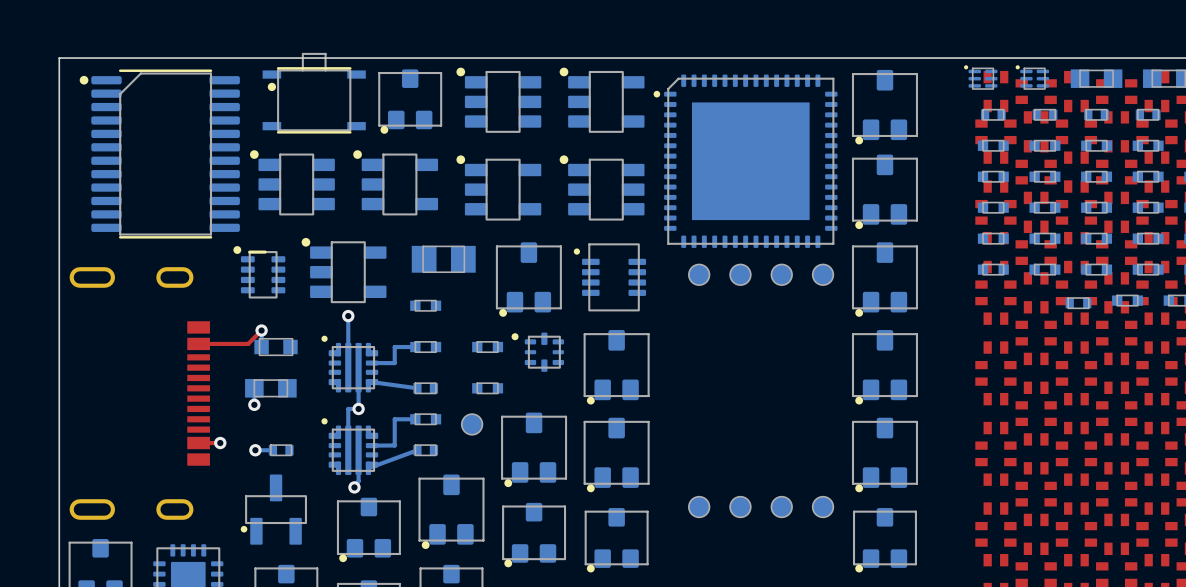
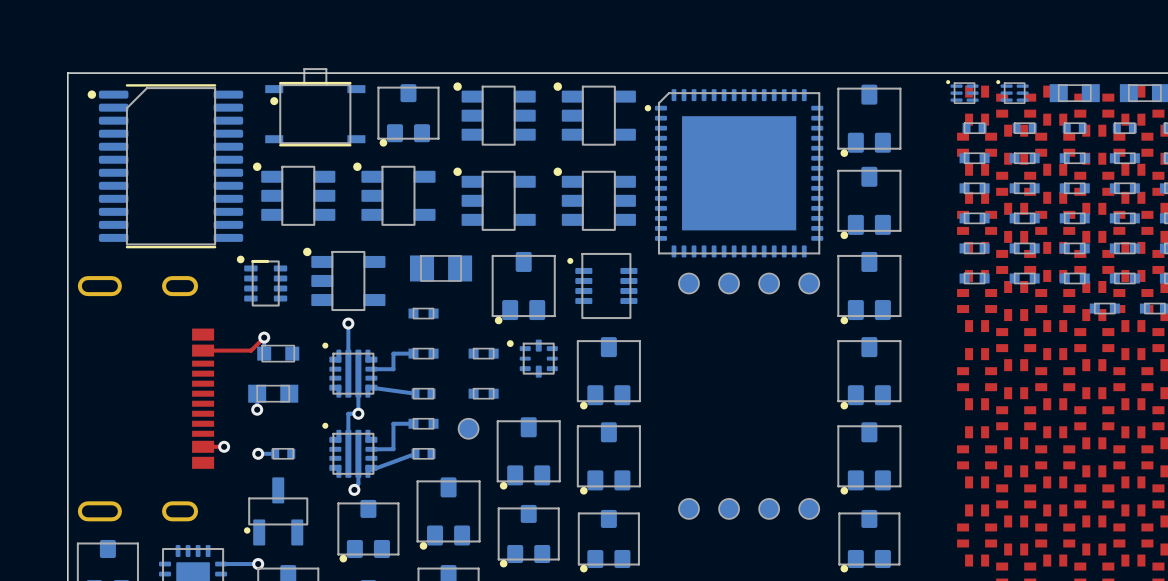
part: (1078, 303) -> none
bottom track: none -> (258, 564) (221, 564)
via: none -> (258, 564)

